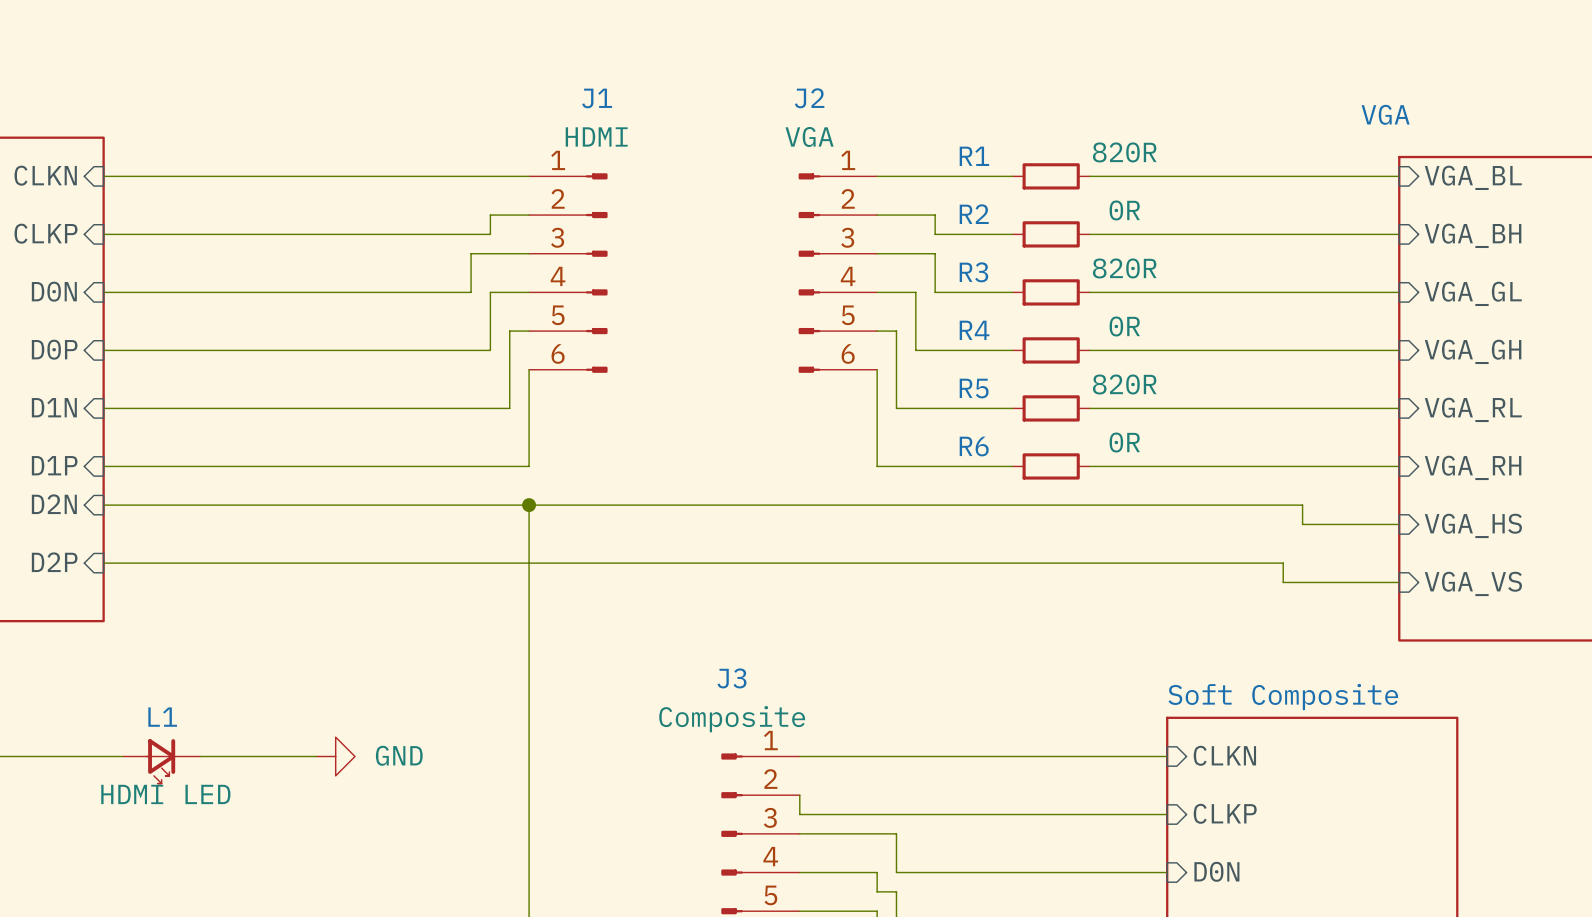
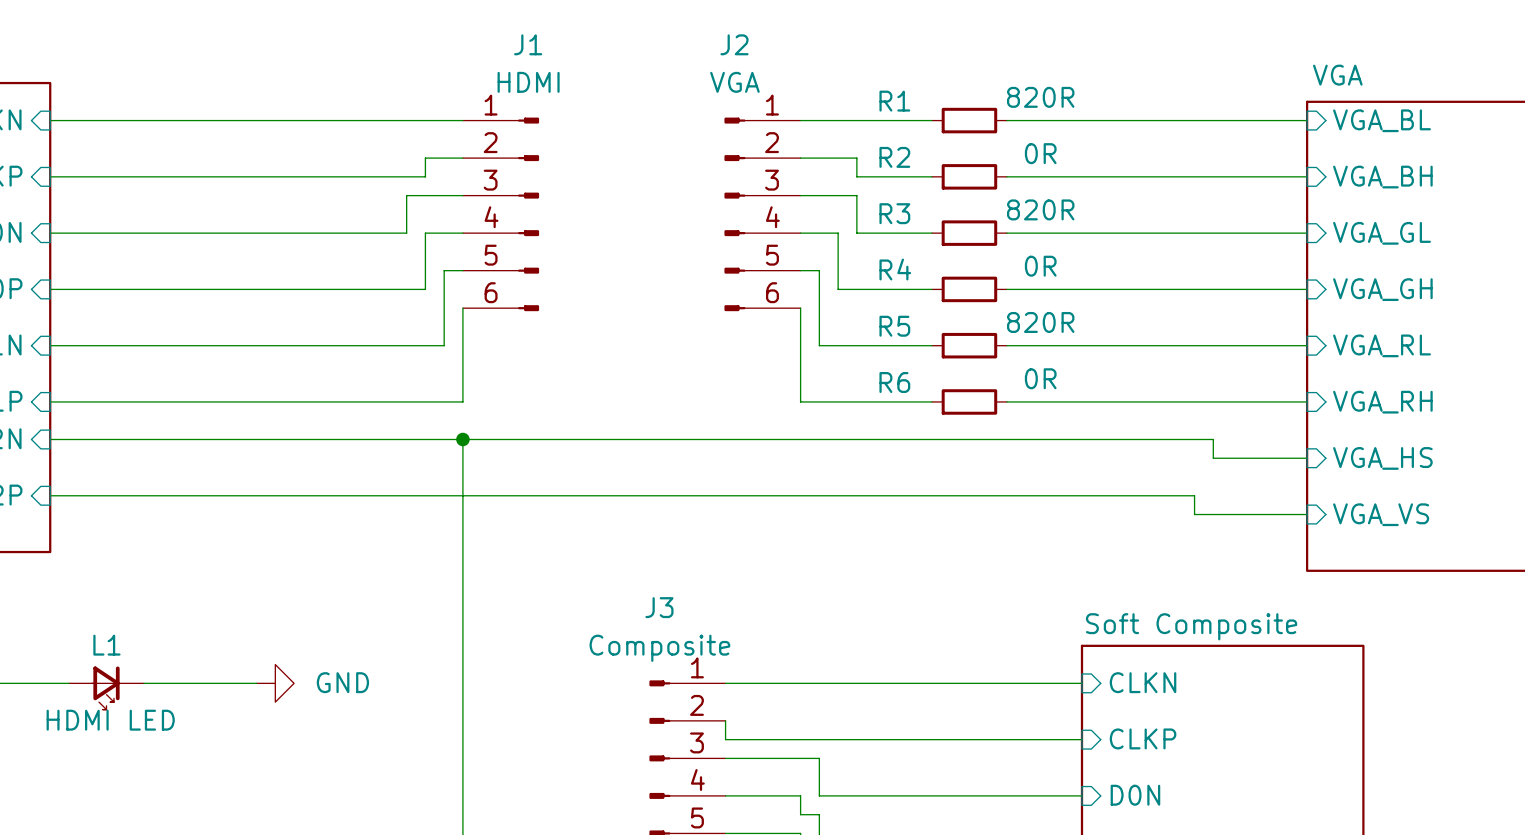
sheet VGA name position: VGA (1385, 114) -> VGA (1337, 75)

